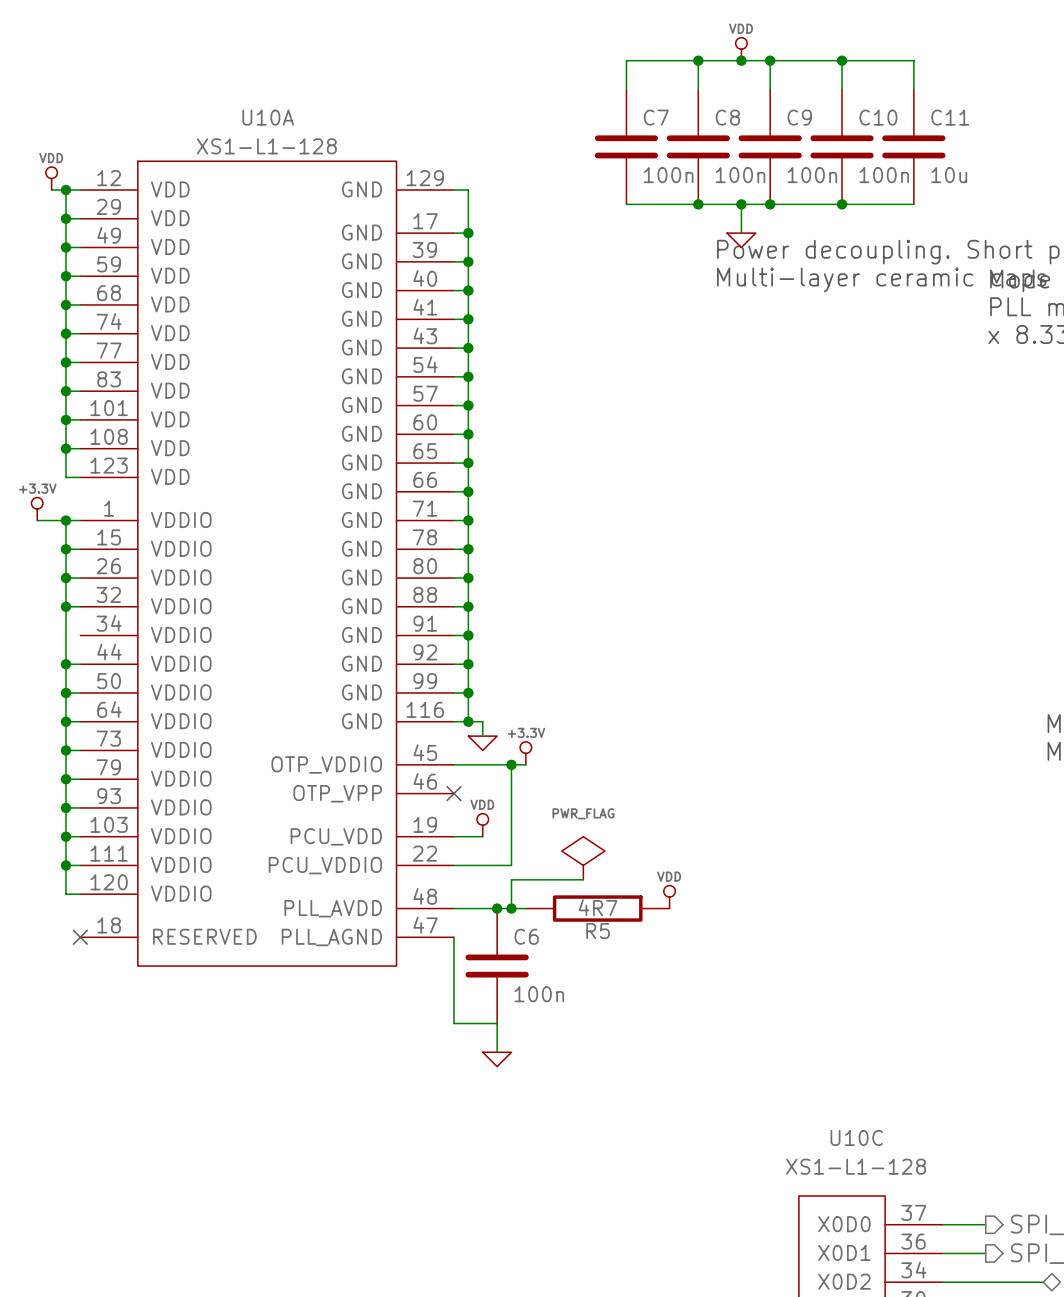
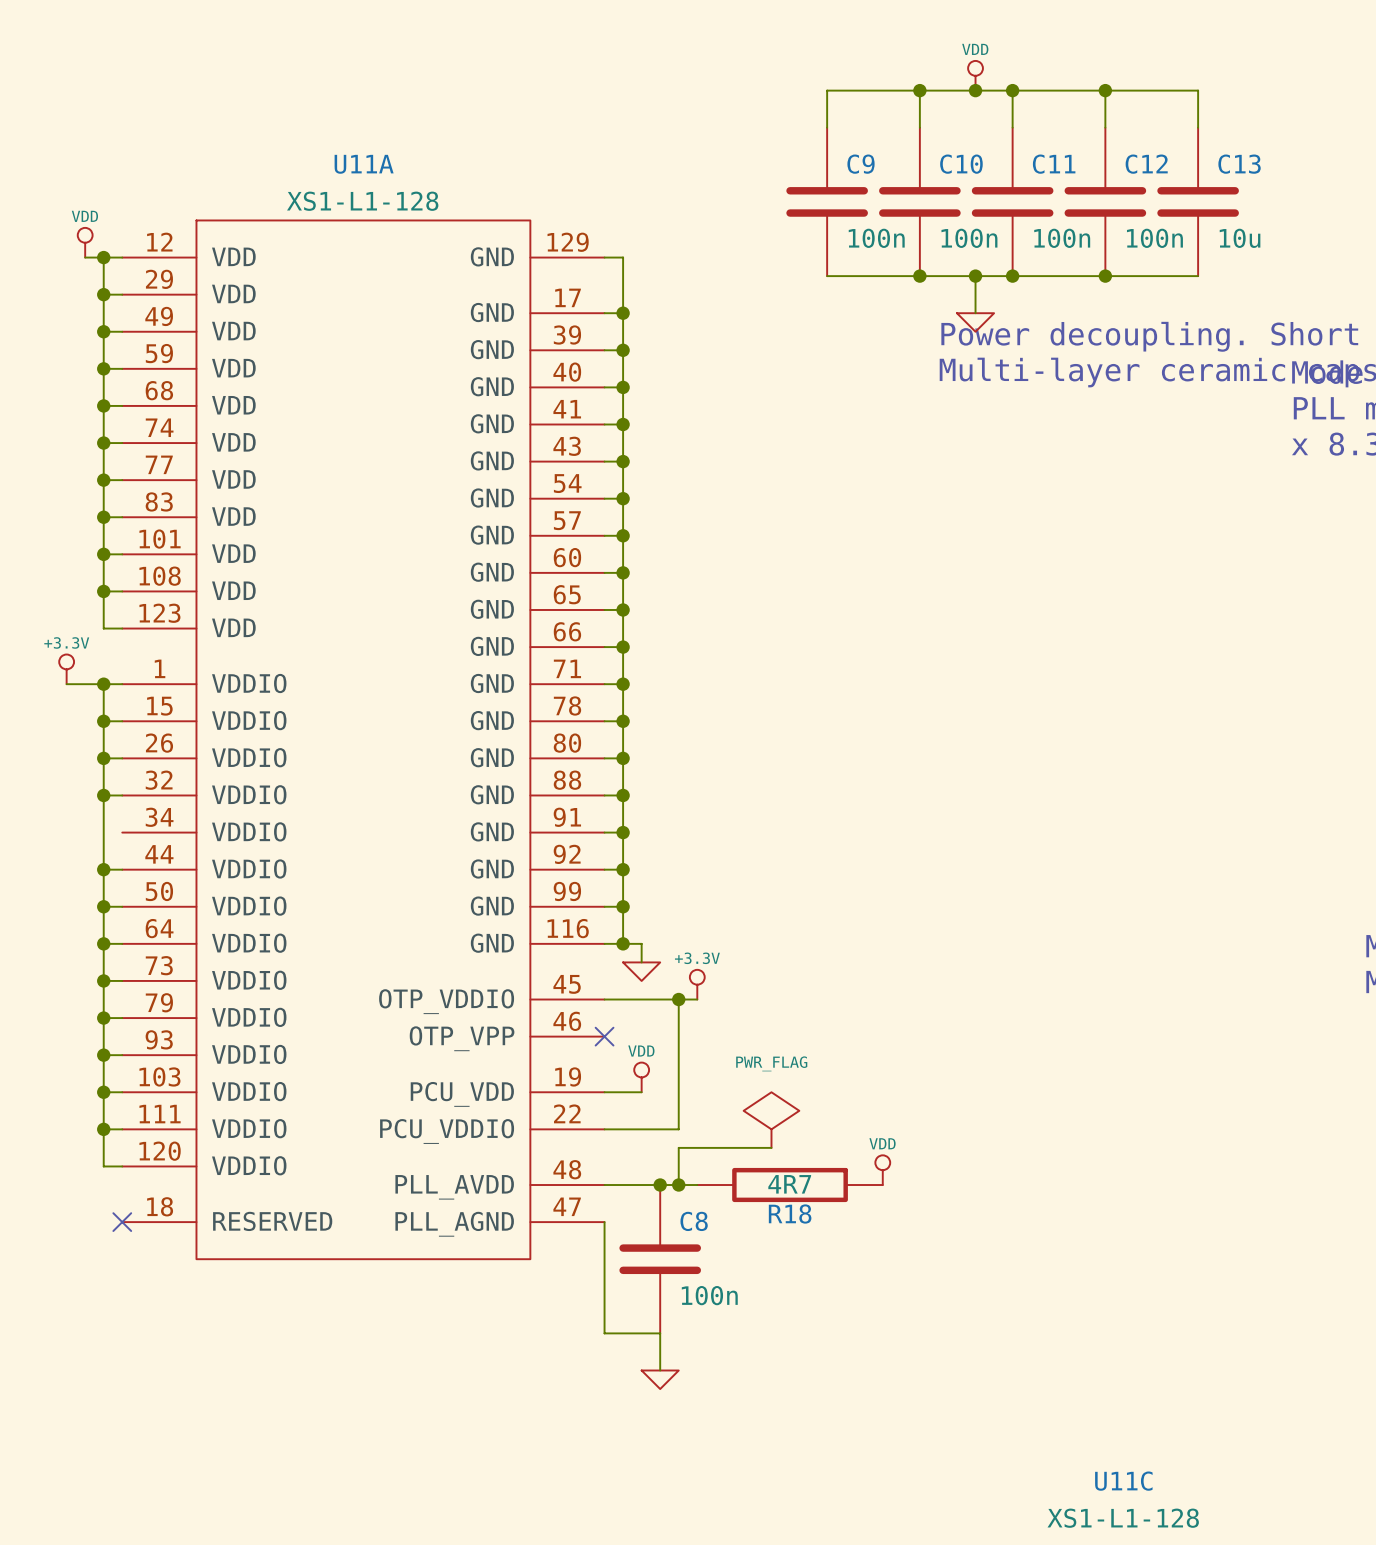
U10A name: U10A (268, 117) -> U11A (364, 164)
C7 name: C7 (656, 117) -> C9 (861, 164)
C8 name: C8 (727, 117) -> C10 (961, 164)
C9 name: C9 (799, 117) -> C11 (1054, 164)
C10 name: C10 (878, 117) -> C12 (1146, 164)
C11 name: C11 (950, 117) -> C13 (1239, 164)
R5 name: R5 (598, 931) -> R18 (790, 1214)
C6 name: C6 (526, 936) -> C8 (694, 1221)
U10C name: U10C (856, 1137) -> U11C (1123, 1481)

